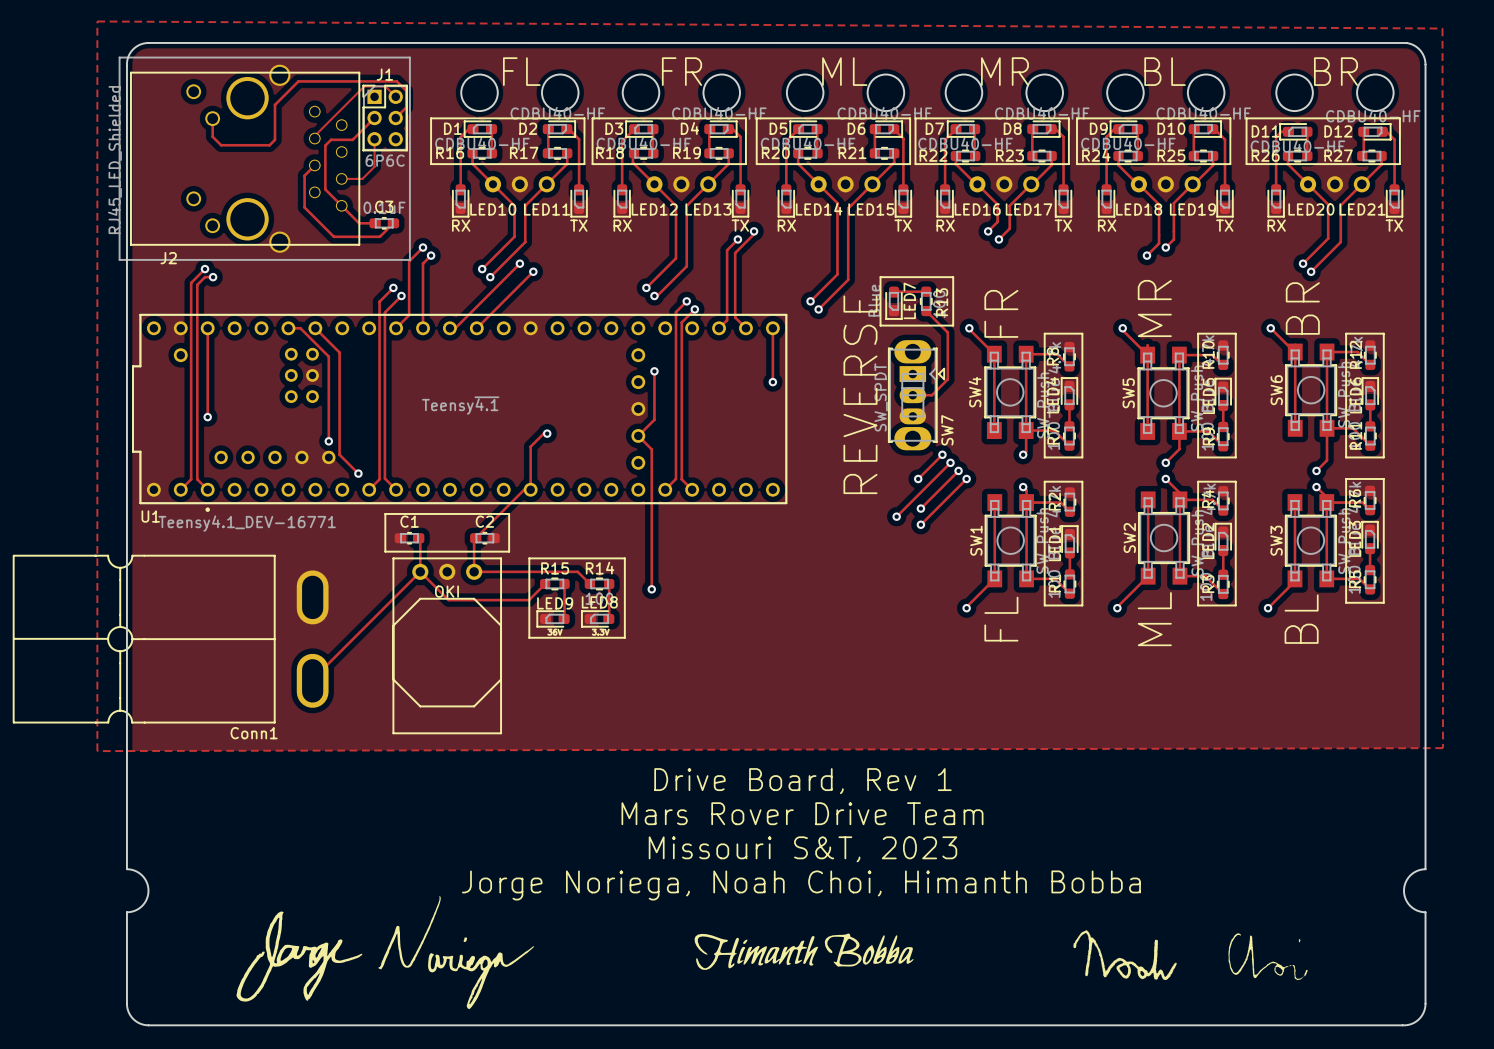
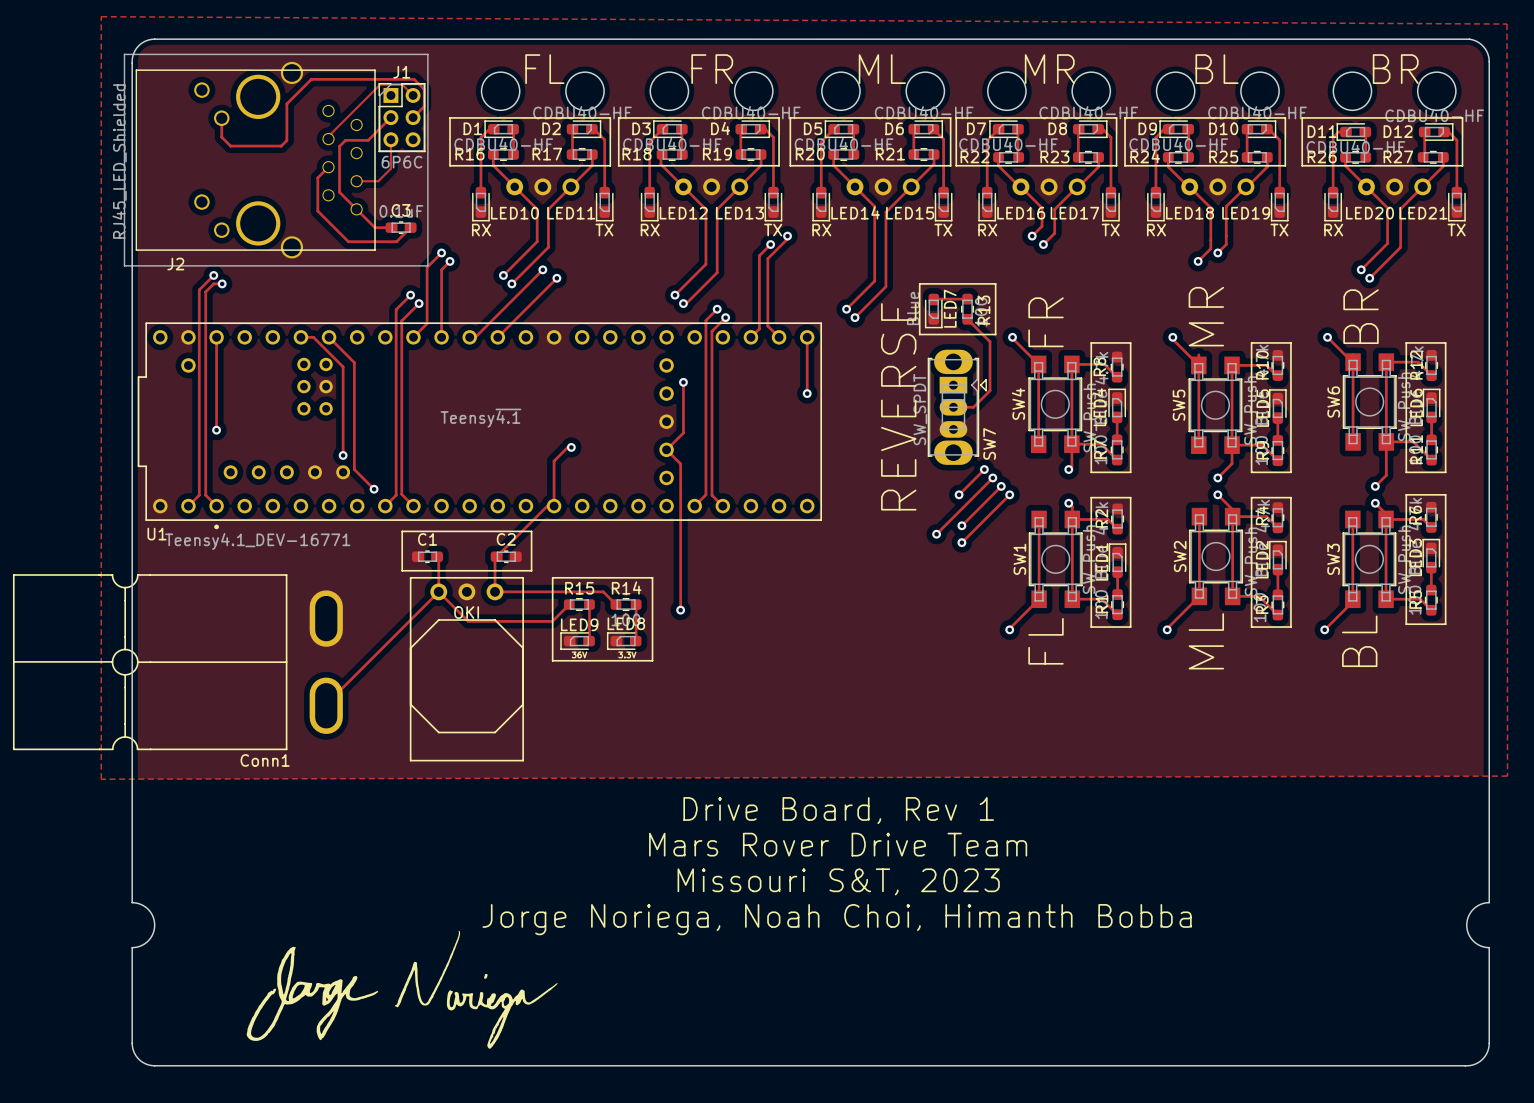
drawing: [1073, 930, 1308, 981] -> none
drawing: [694, 933, 914, 970] -> none

